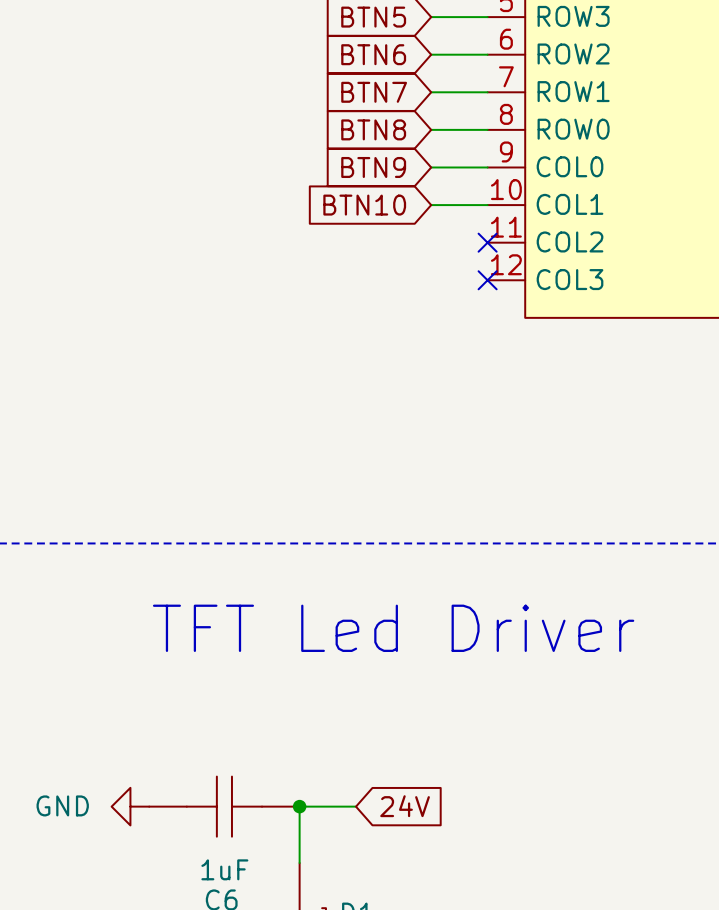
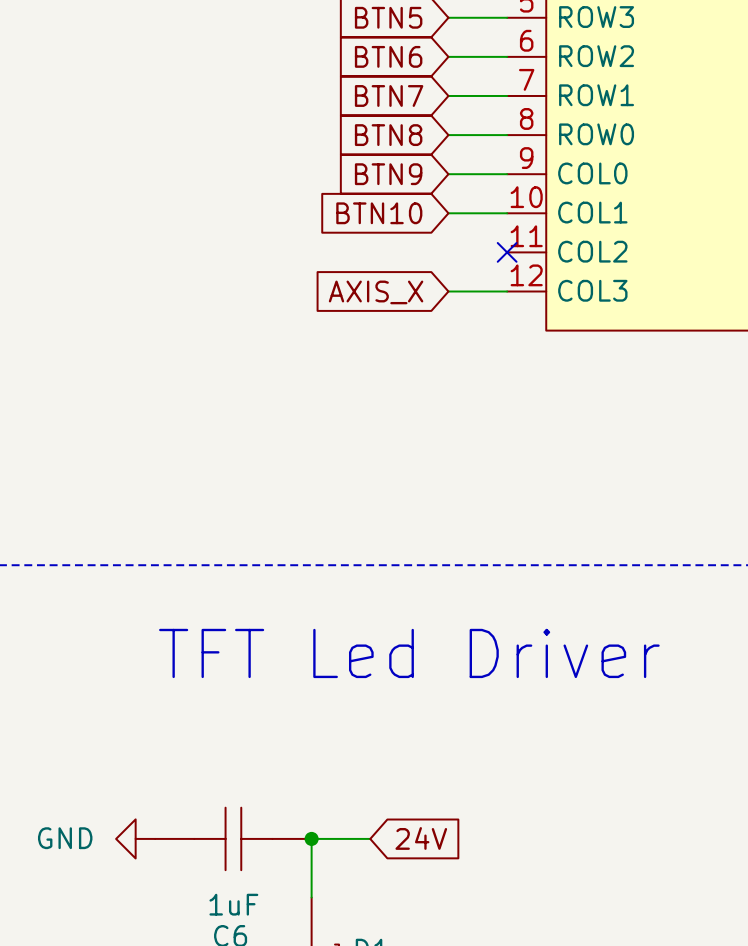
wire: none -> (448, 291) (507, 291)
no-connect mark: (487, 280) -> none
global label: none -> AXIS_X (376, 292)

